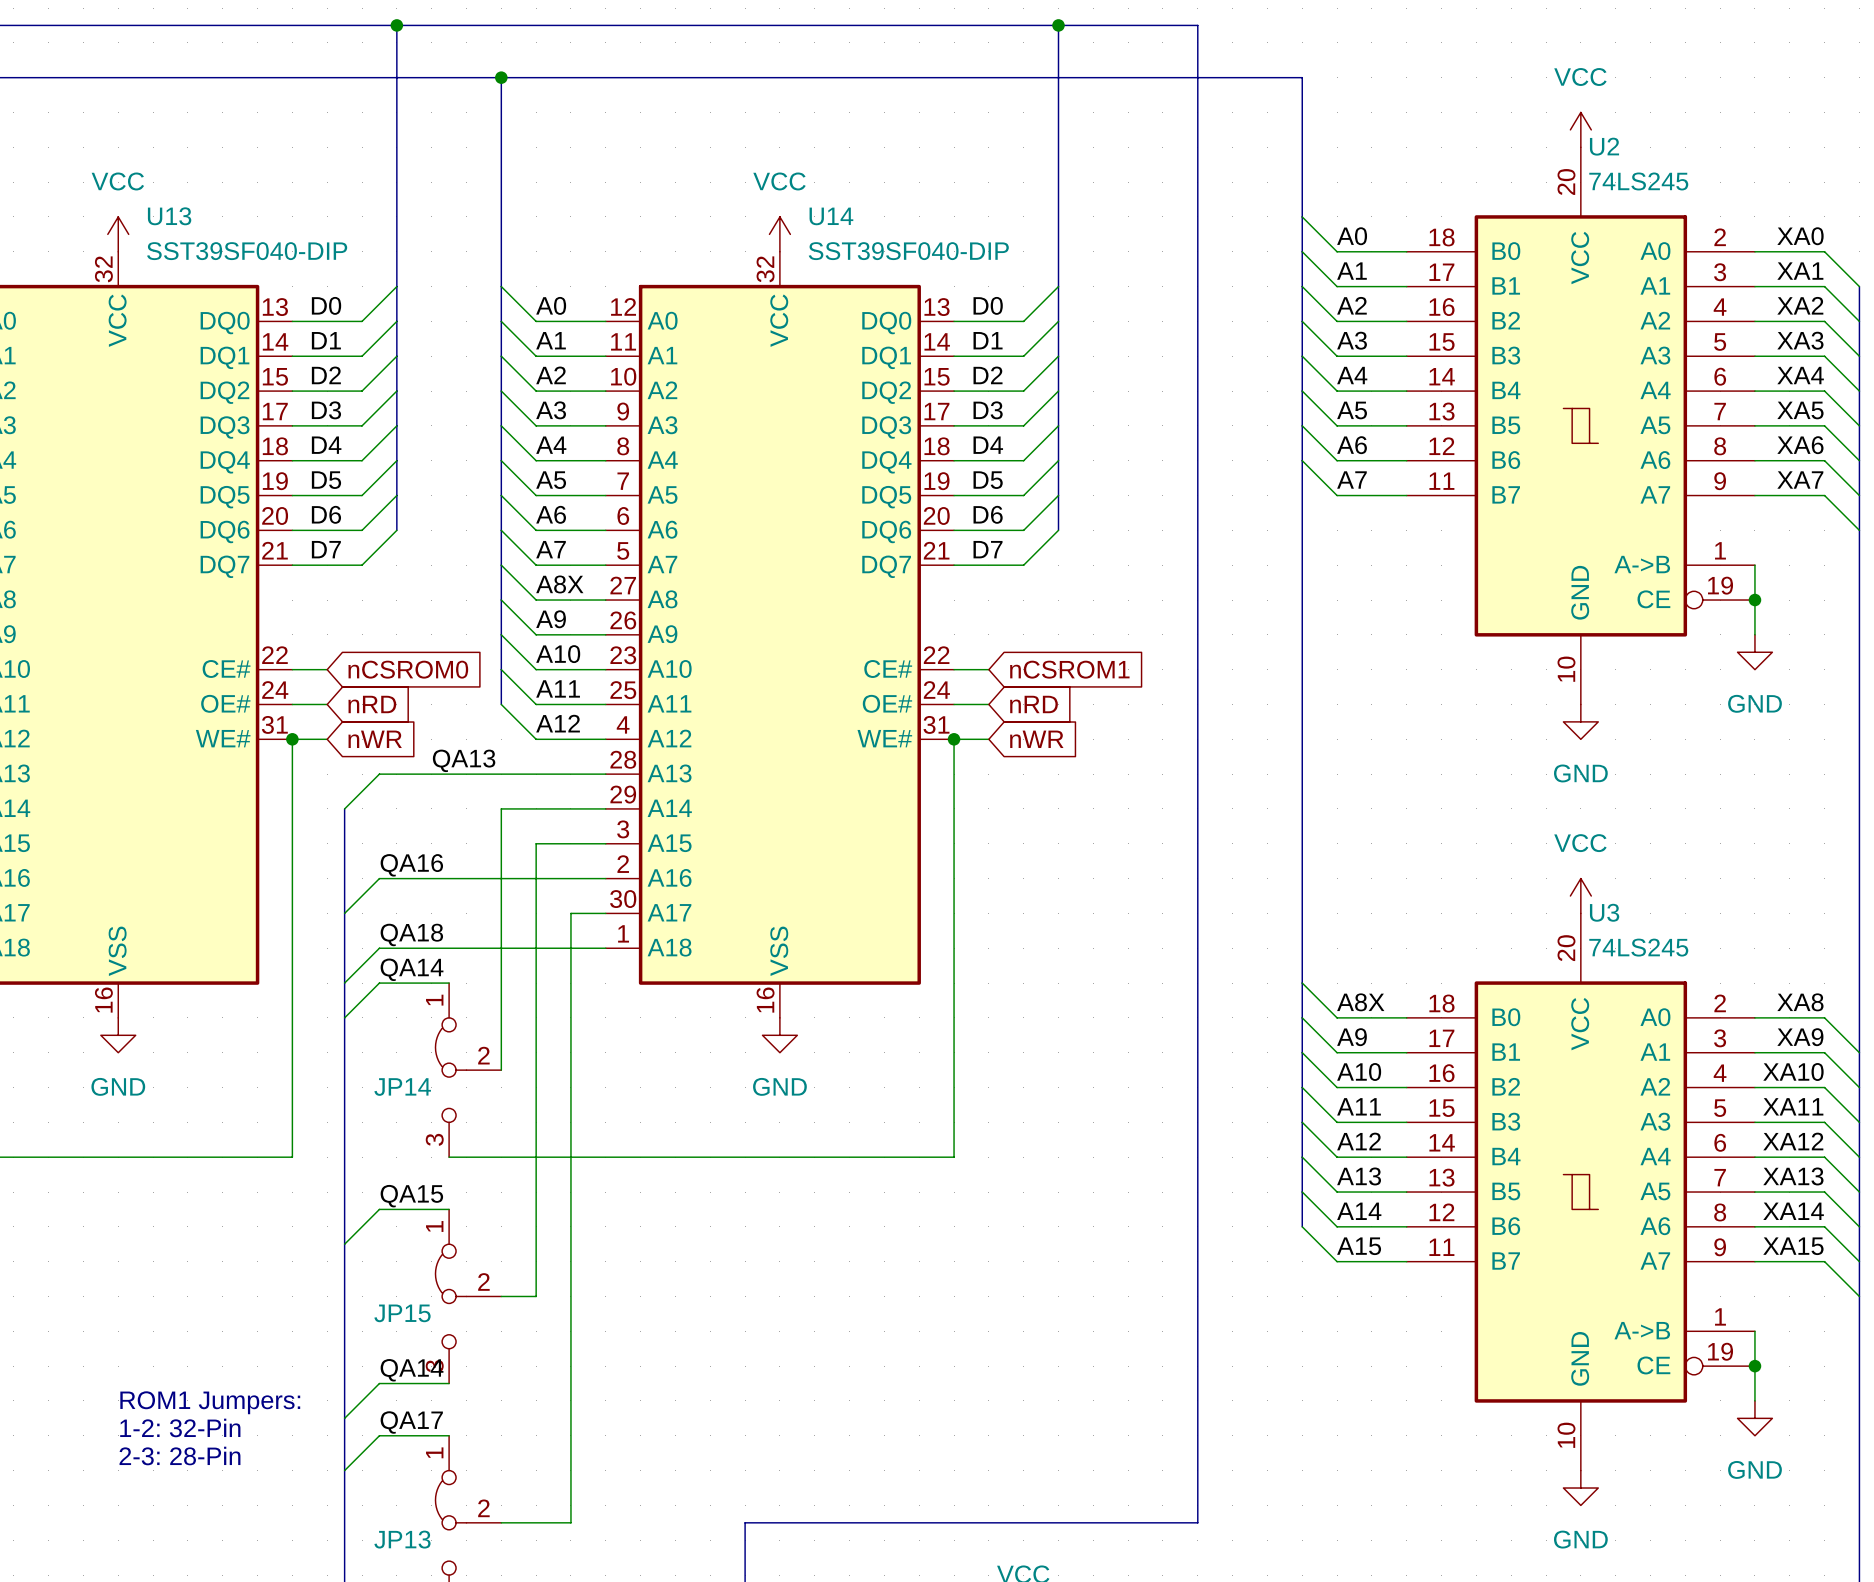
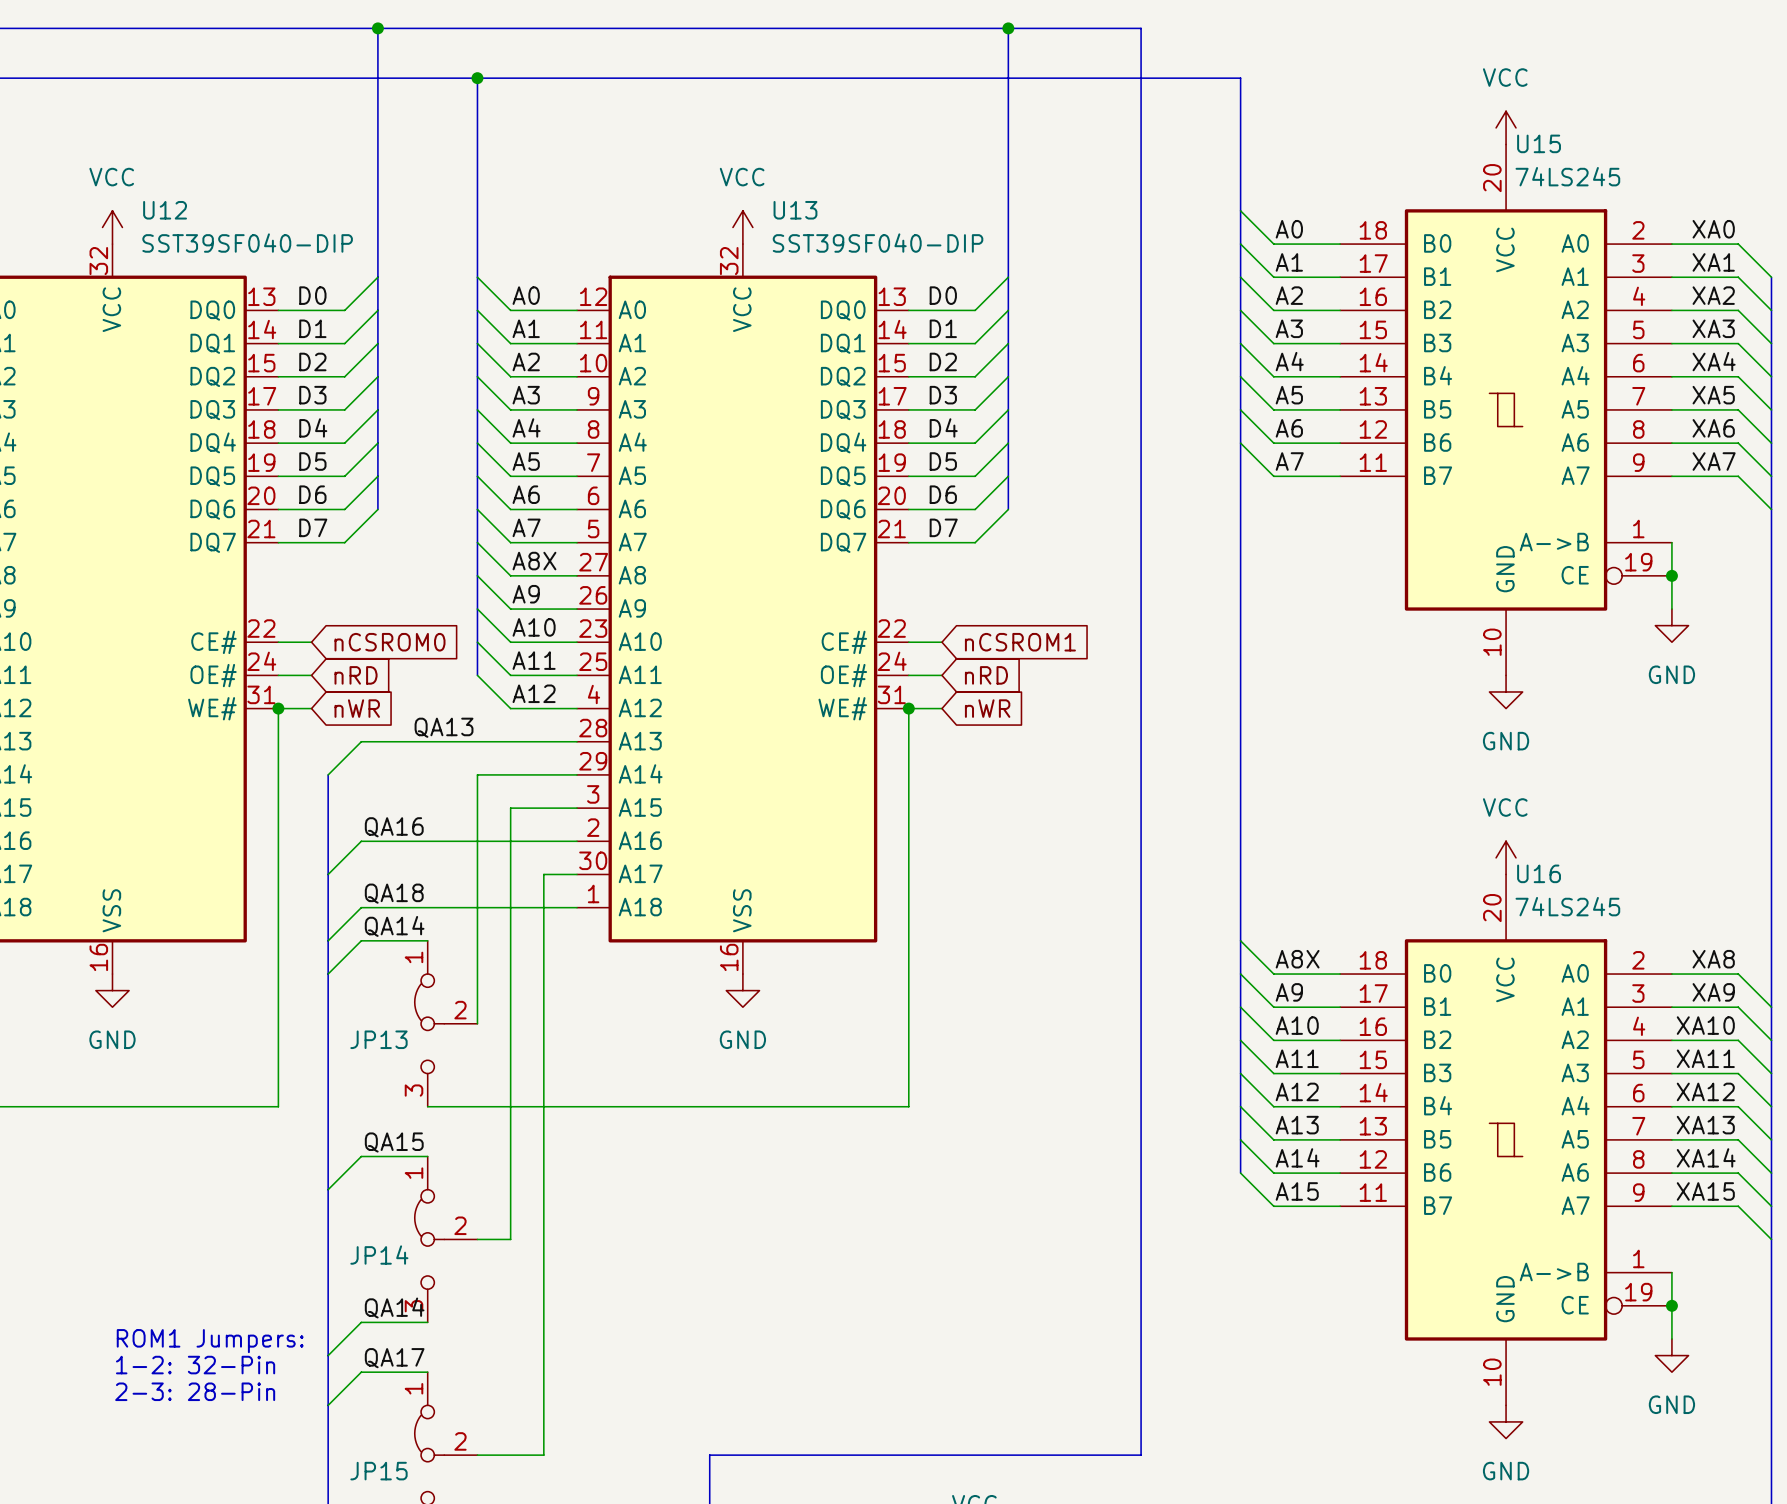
U2 name: U2 (1604, 146) -> U15 (1539, 143)
U13 name: U13 (169, 216) -> U12 (165, 210)
U14 name: U14 (831, 216) -> U13 (795, 210)
U3 name: U3 (1604, 912) -> U16 (1539, 873)
JP14 name: JP14 (402, 1087) -> JP13 (378, 1039)
JP15 name: JP15 (402, 1313) -> JP14 (379, 1255)
JP13 name: JP13 (402, 1539) -> JP15 (378, 1471)

